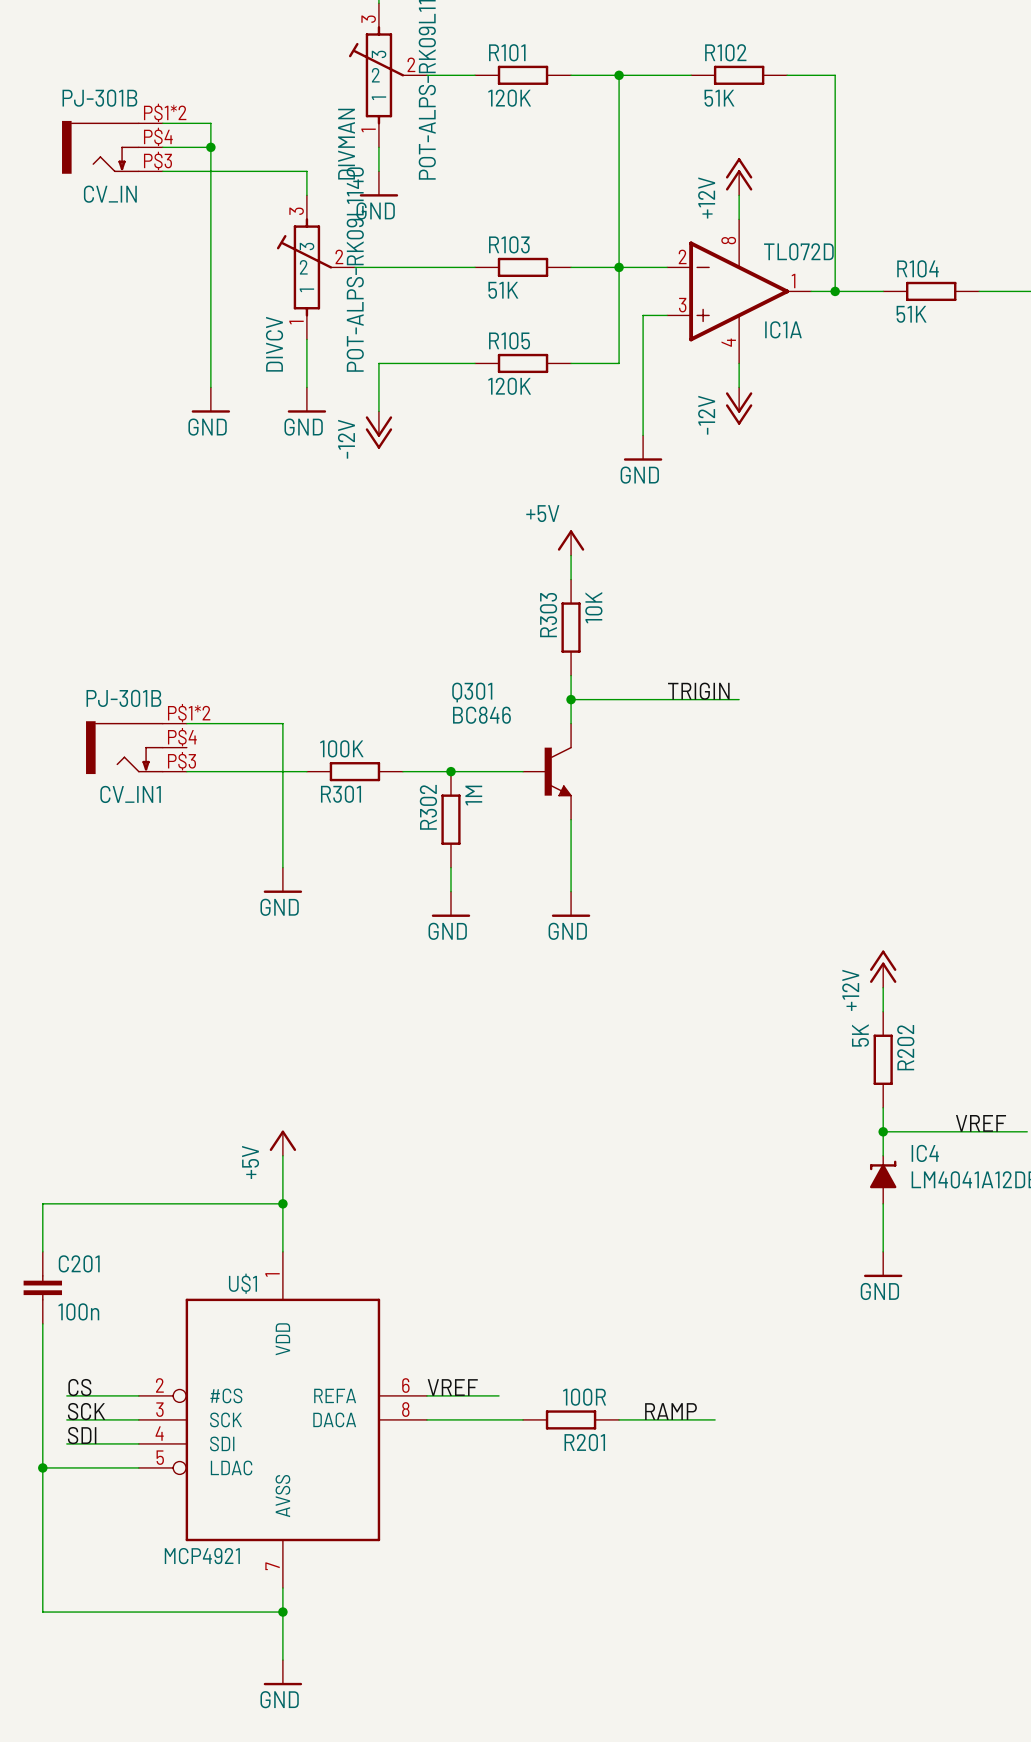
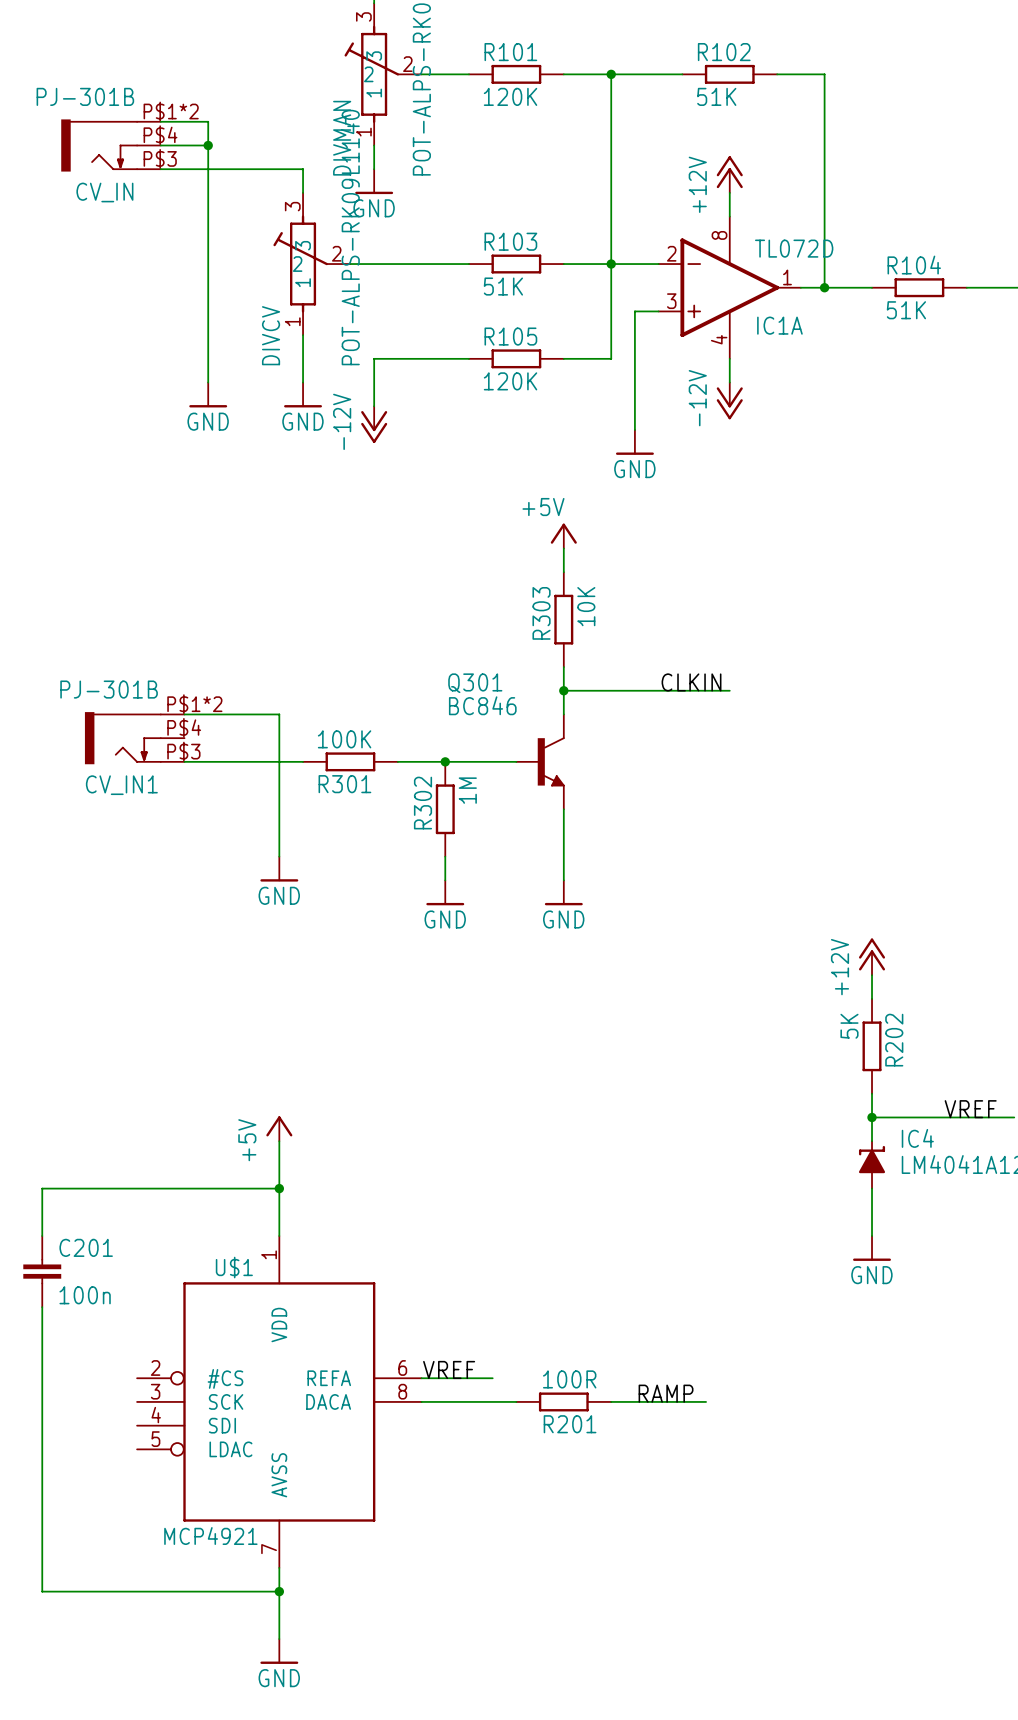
label: TRIGIN (698, 691) -> CLKIN (691, 682)
label: CS (79, 1387) -> none
wire: (66, 1395) (138, 1395) -> none
label: SCK (86, 1411) -> none
wire: (66, 1419) (138, 1419) -> none
label: SDI (82, 1435) -> none
wire: (66, 1443) (138, 1443) -> none
wire: (42, 1467) (138, 1467) -> none
junction: (42, 1467) -> none

